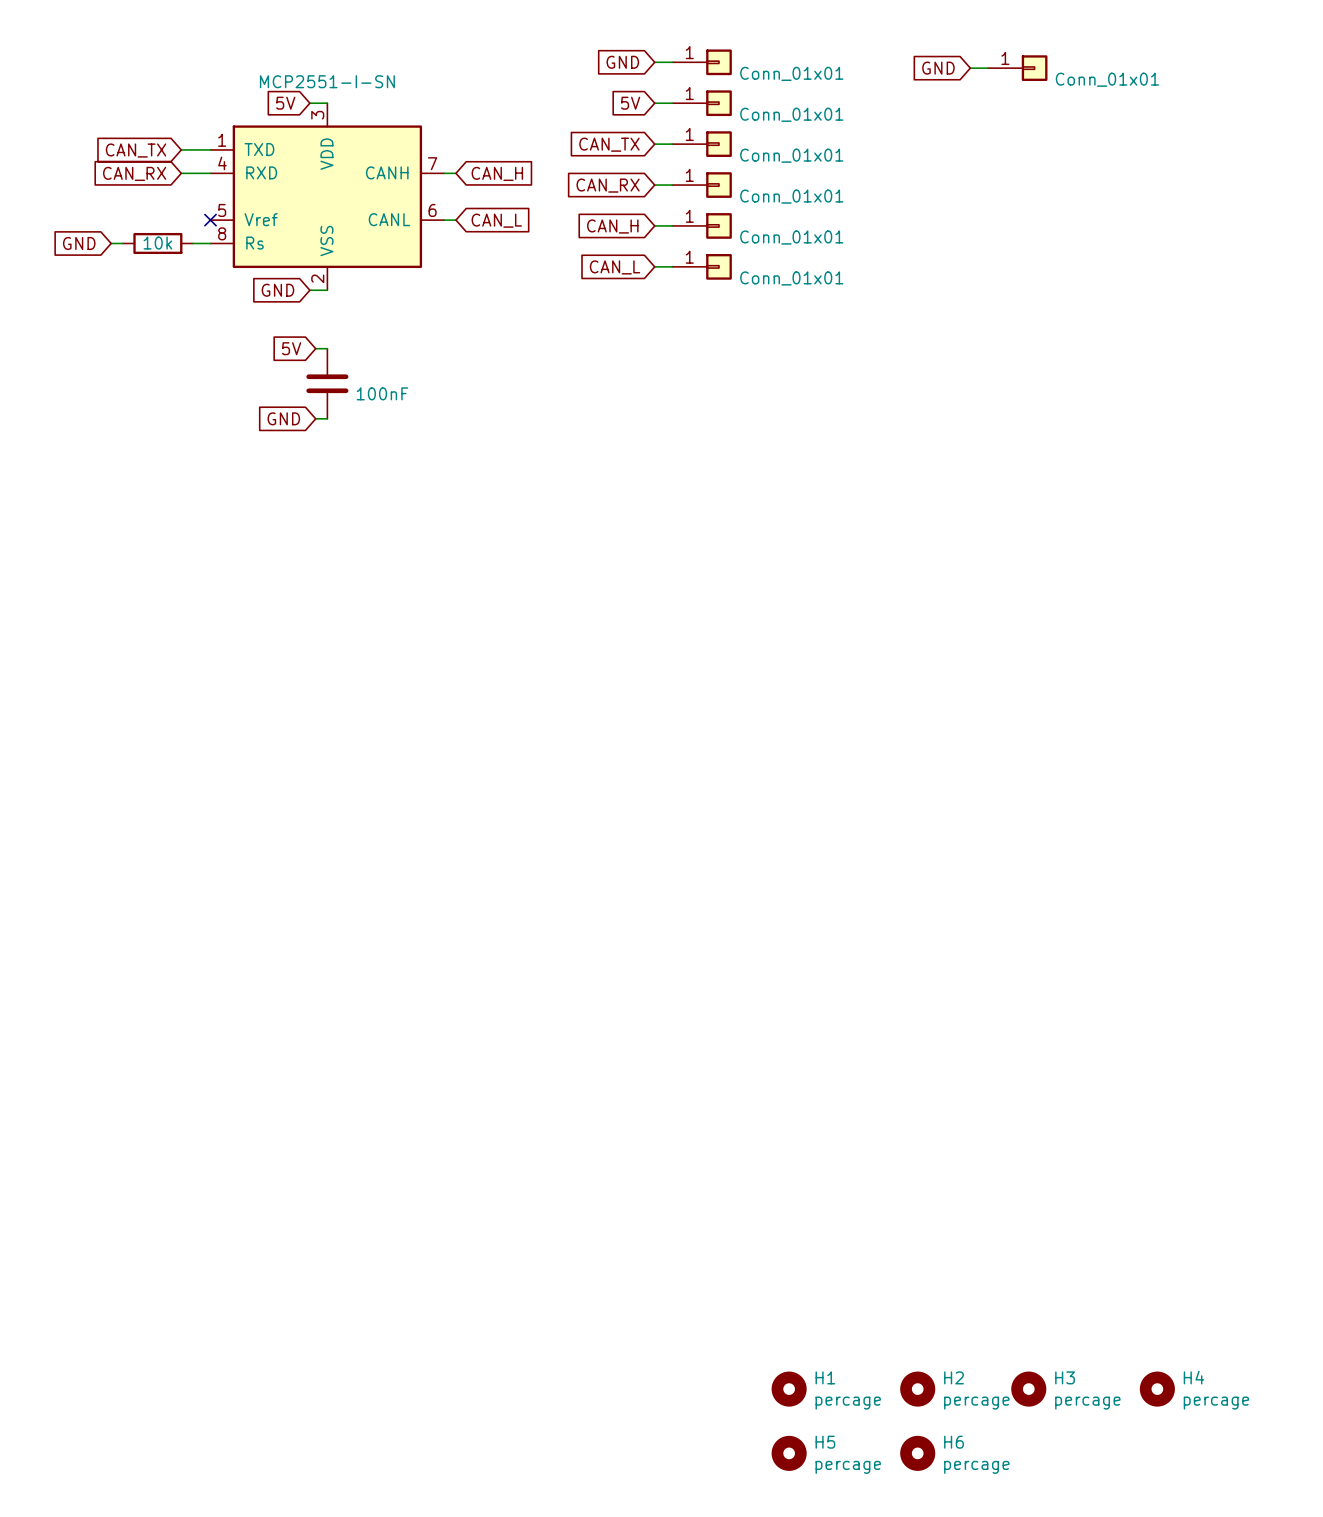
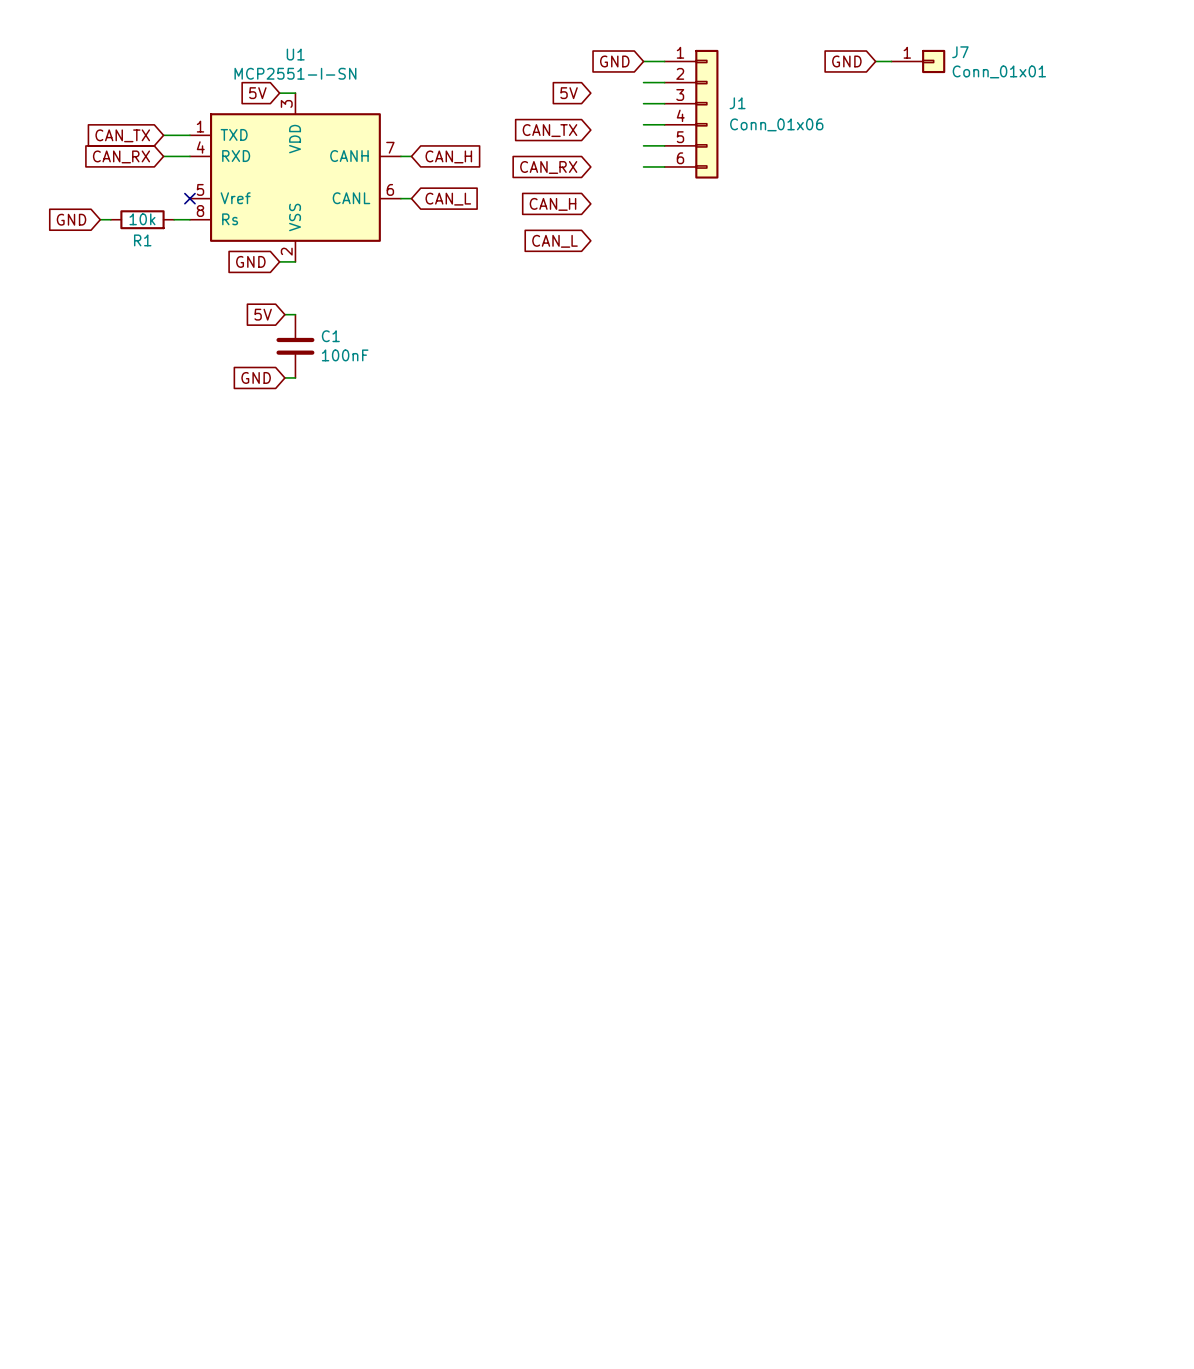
J7 name: none -> J7 (960, 52)
U1 name: none -> U1 (295, 54)
global label position: GND (622, 62) -> GND (614, 61)
wire: (654, 62) (672, 62) -> none
part: Conn_01x01 (702, 62) -> none
wire: (654, 103) (672, 103) -> none
part: Conn_01x01 (702, 103) -> none
J1: none -> Conn_01x06 (691, 114)
wire: (654, 144) (672, 144) -> none
part: Conn_01x01 (702, 144) -> none
wire: none -> (643, 145) (664, 145)
wire: (654, 185) (672, 185) -> none
part: Conn_01x01 (702, 185) -> none
wire: (654, 225) (672, 225) -> none
part: Conn_01x01 (702, 225) -> none
R1 name: none -> R1 (142, 240)
wire: (654, 266) (672, 266) -> none
part: Conn_01x01 (702, 266) -> none
C1 name: none -> C1 (330, 336)
H1: percage (789, 1389) -> none
H2: percage (917, 1389) -> none
H3: percage (1028, 1389) -> none
H4: percage (1157, 1389) -> none
H5: percage (789, 1453) -> none
H6: percage (917, 1453) -> none

